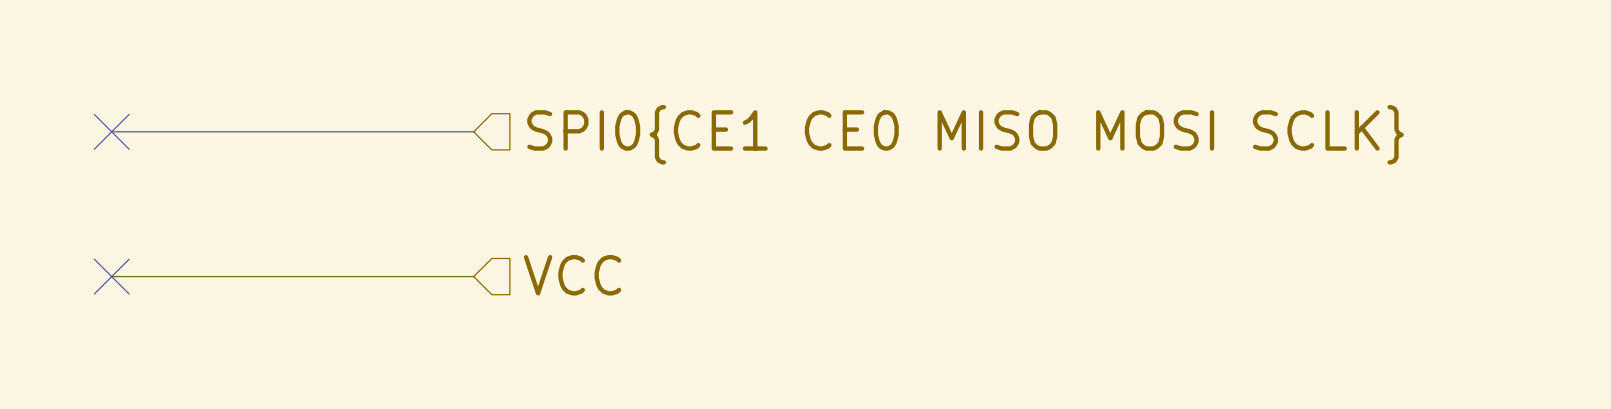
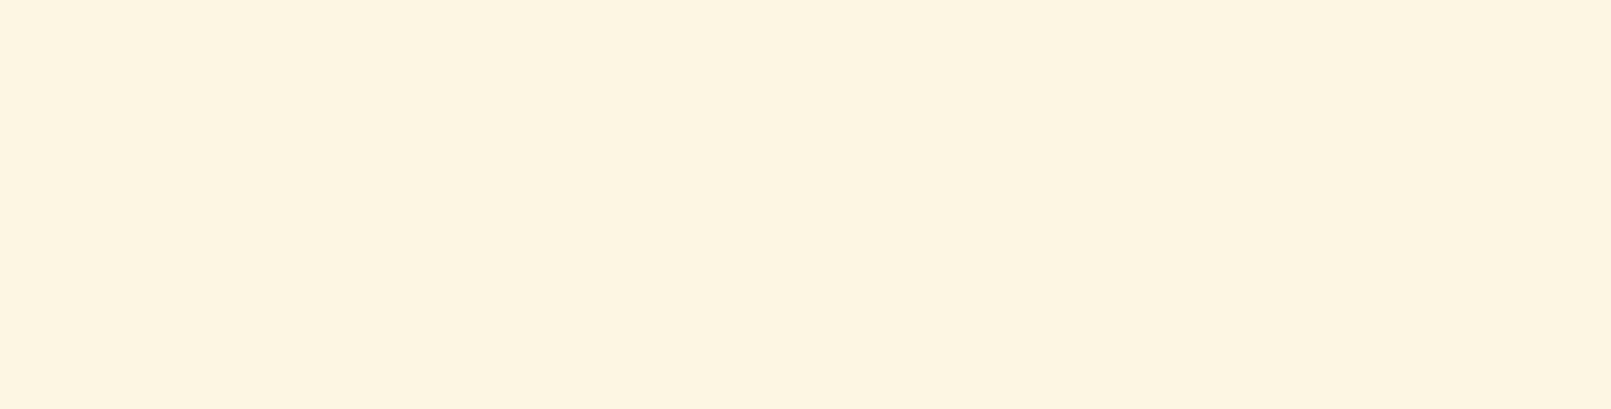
bus: (111, 131) (473, 131) -> none
no-connect mark: (111, 131) -> none
hierarchical label: SPI0{CE1 CE0 MISO MOSI SCLK} (965, 134) -> none
hierarchical label: VCC (572, 275) -> none
wire: (111, 276) (473, 276) -> none
no-connect mark: (111, 276) -> none

